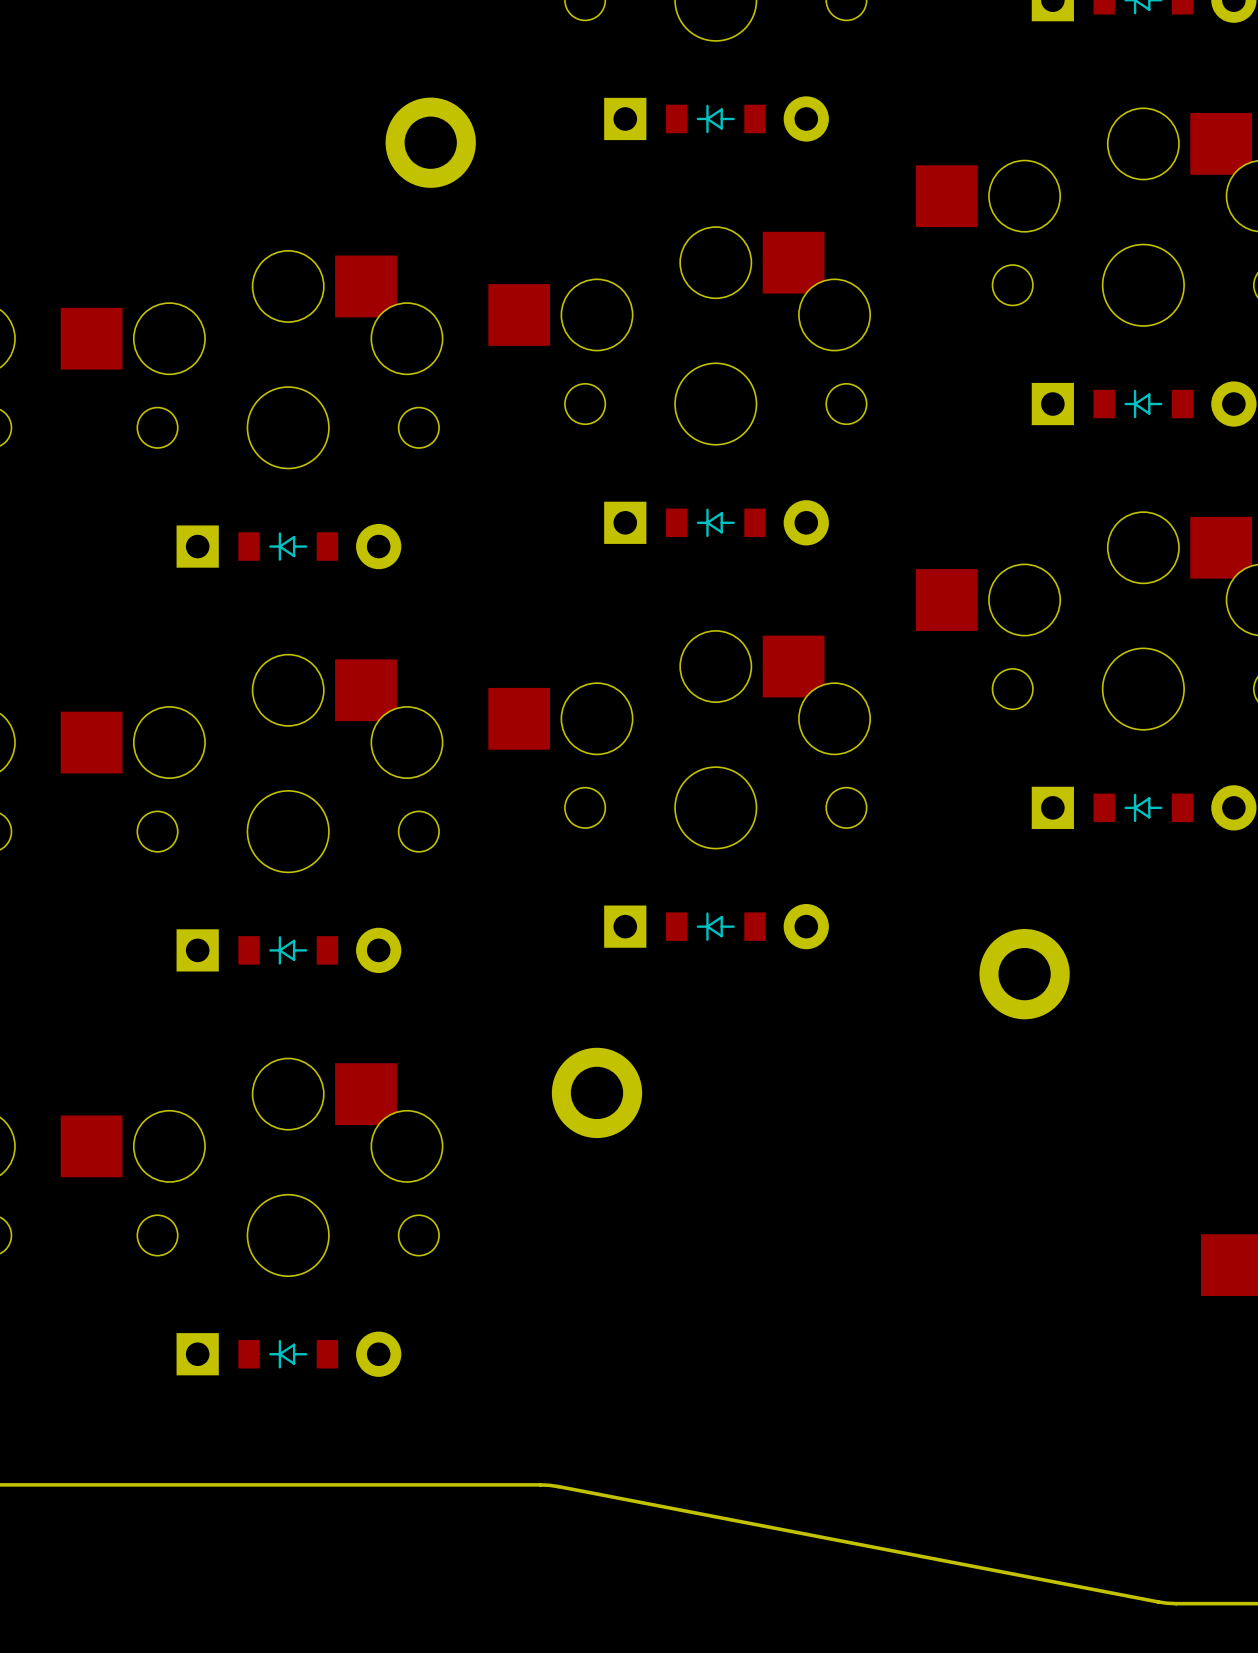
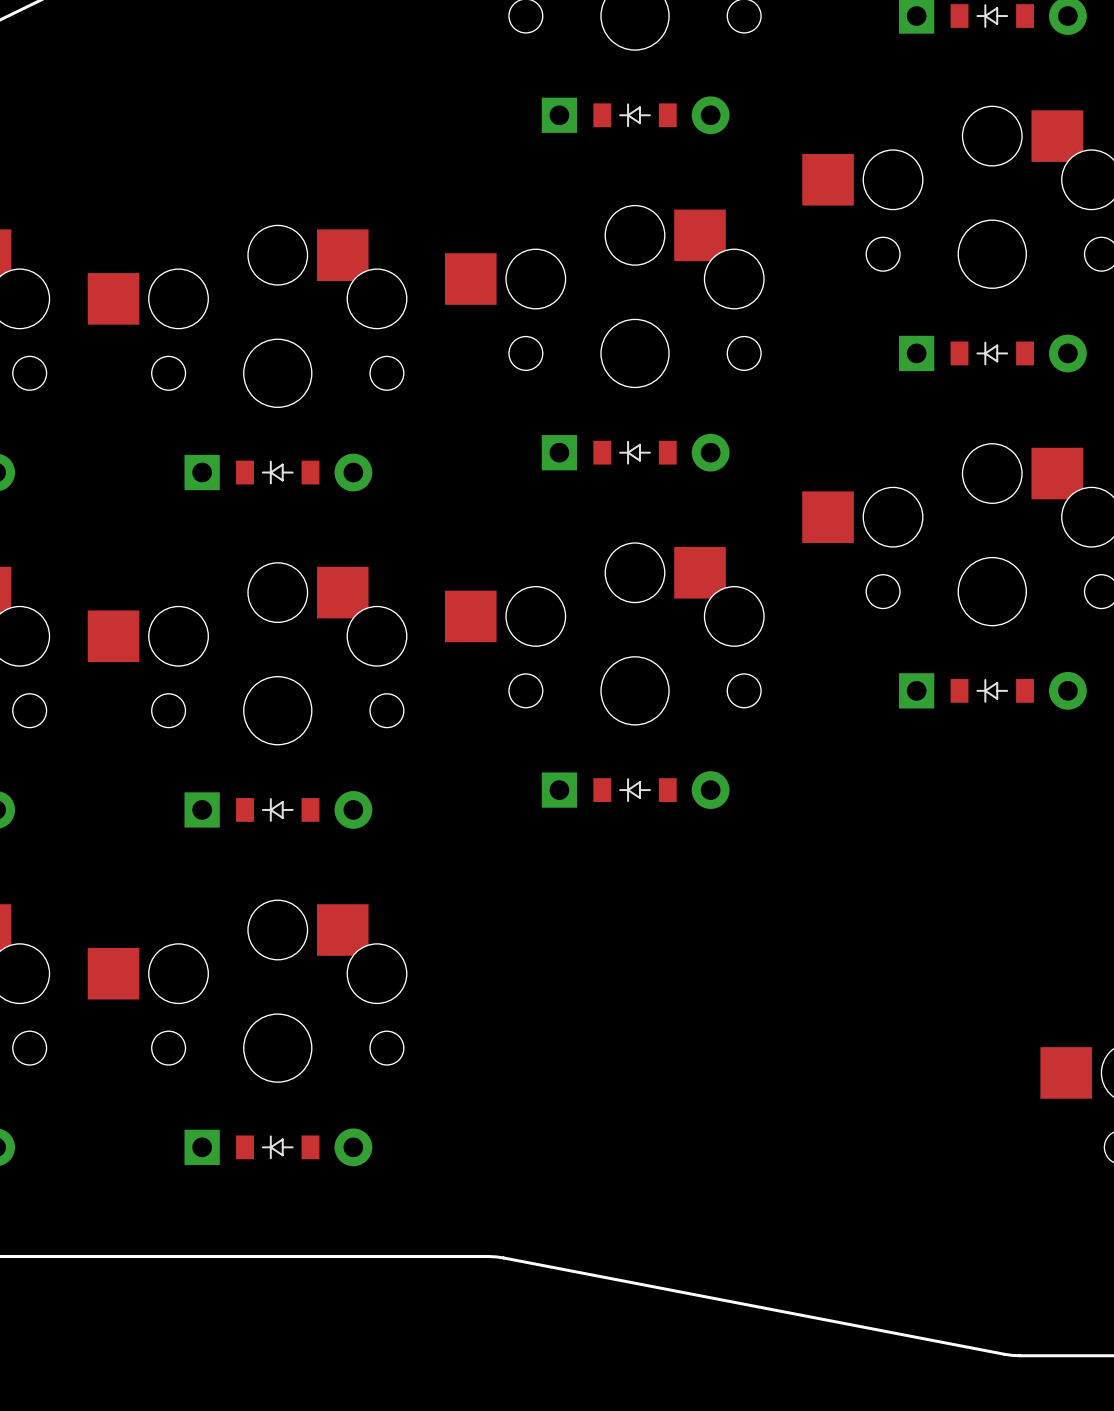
part: (430, 142) -> none
part: (1024, 974) -> none
part: (597, 1092) -> none

